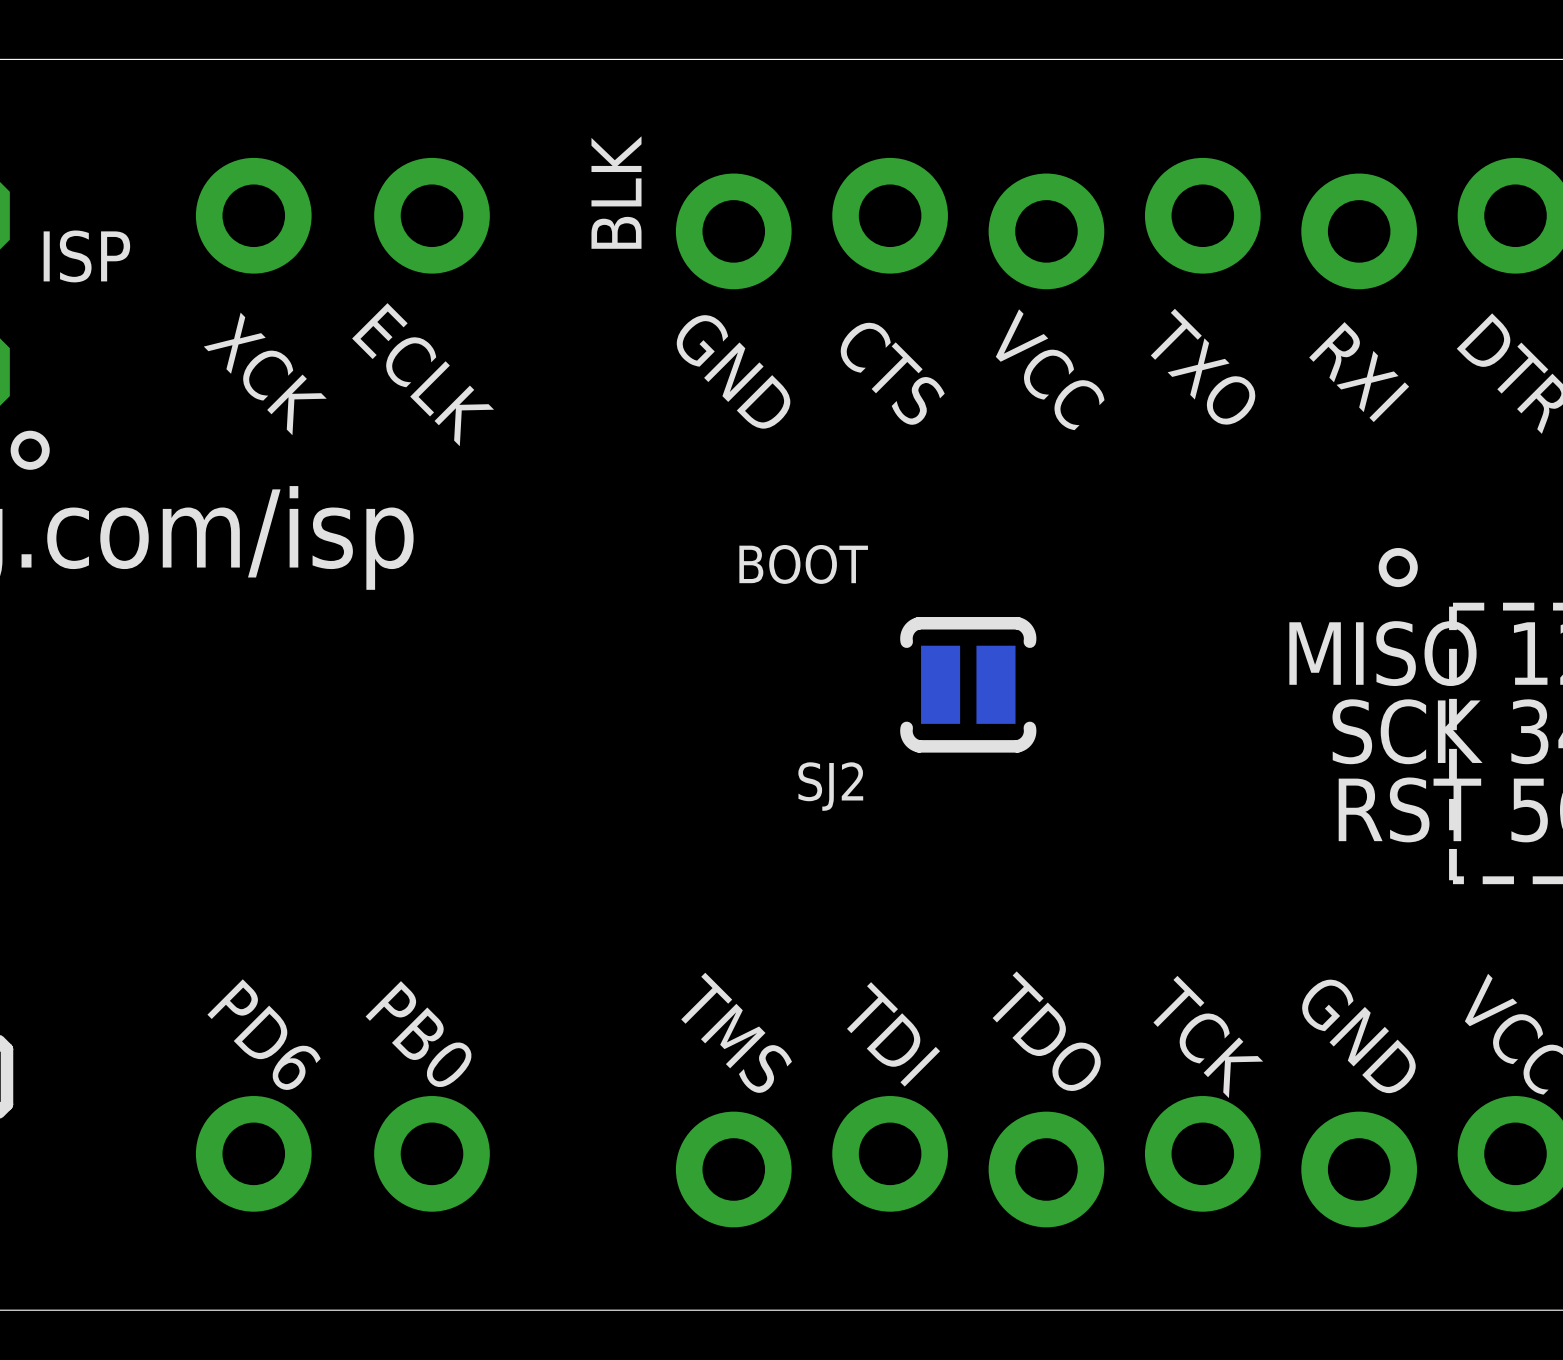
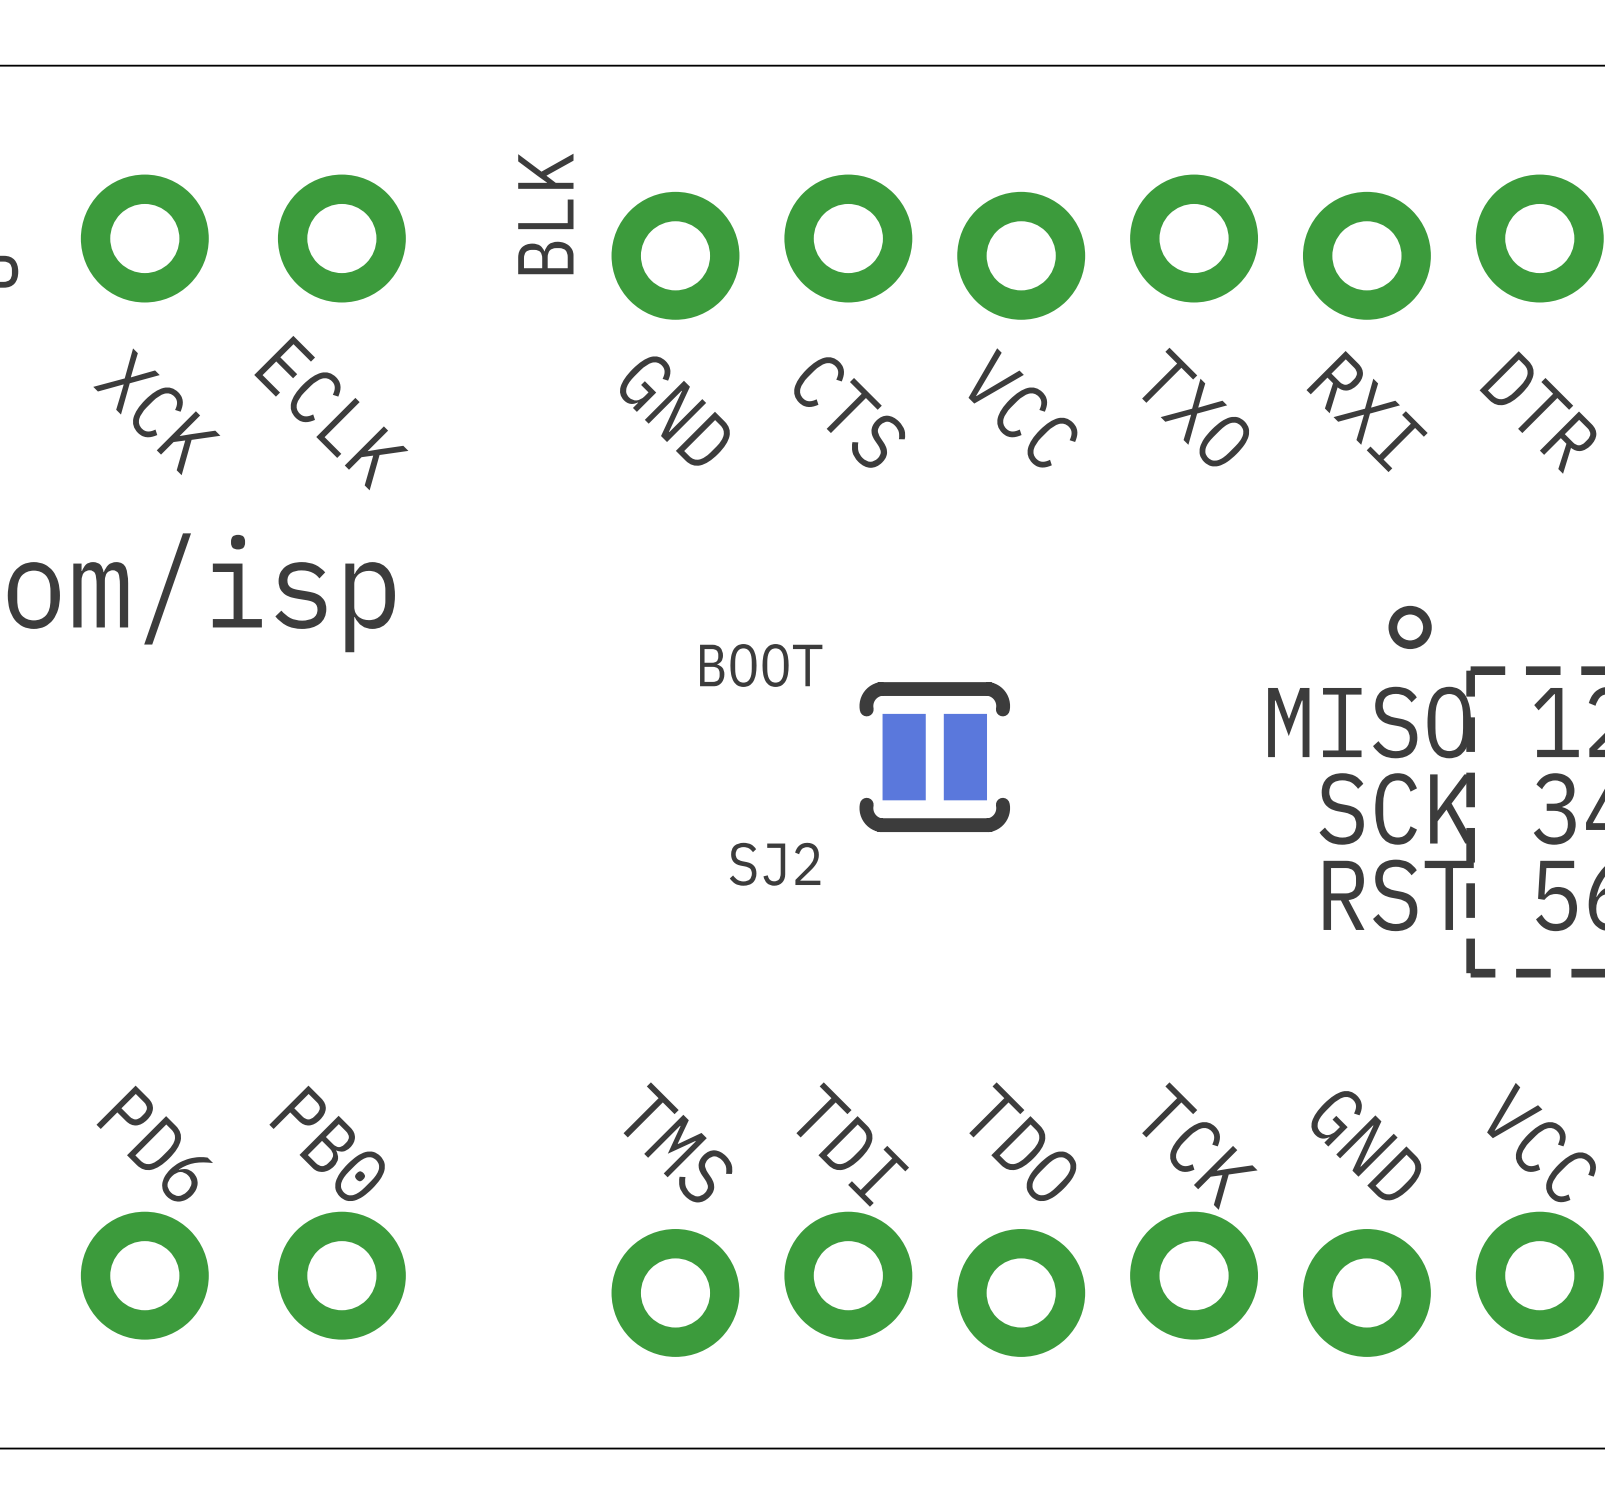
SJ2 value position: BOOT (803, 564) -> BOOT (761, 665)

